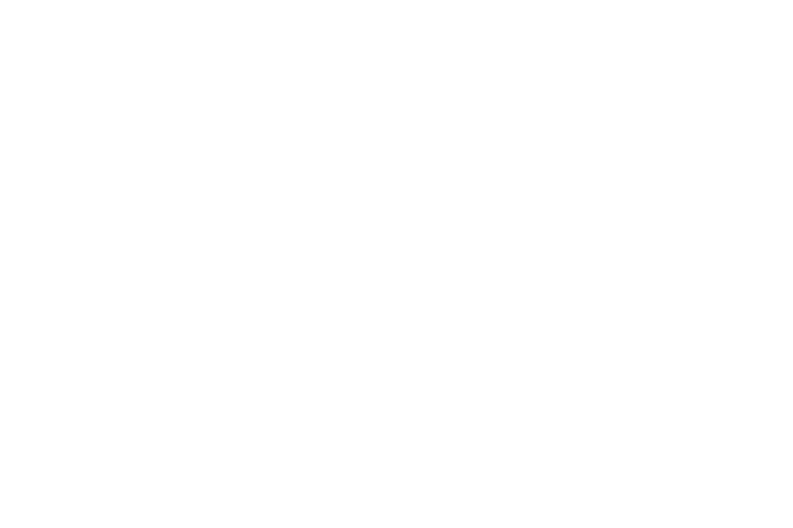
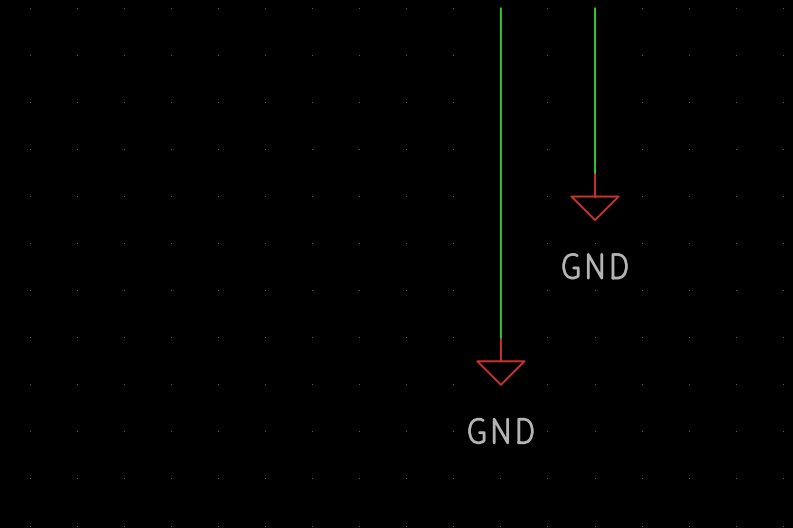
wire: none -> (500, 8) (500, 337)
wire: none -> (595, 8) (595, 173)
power symbol: none -> GND (595, 196)
power symbol: none -> GND (500, 361)

